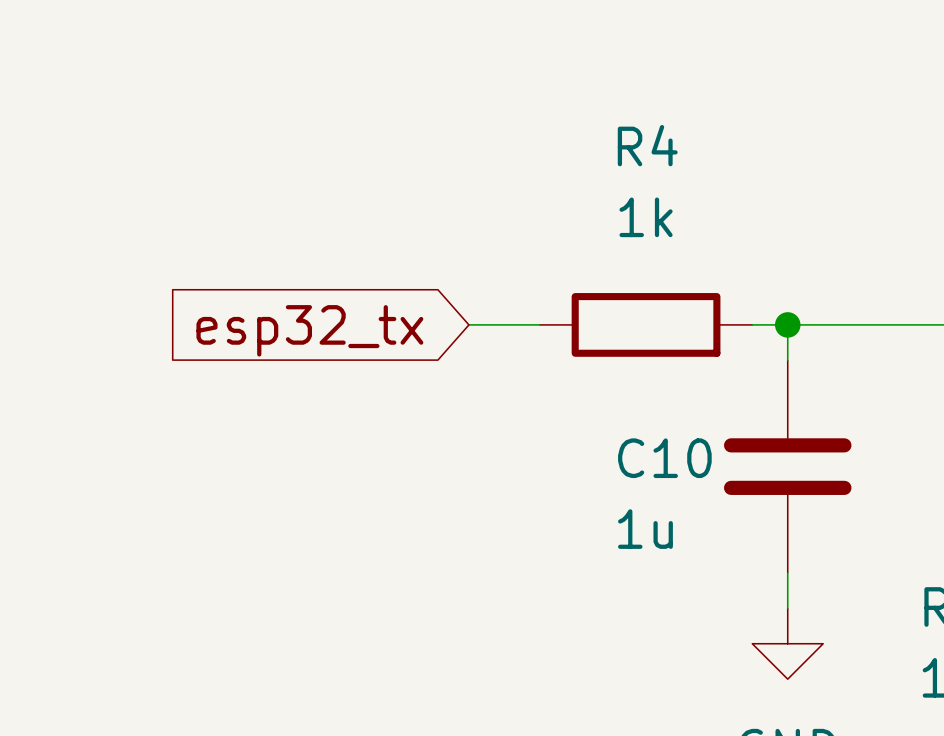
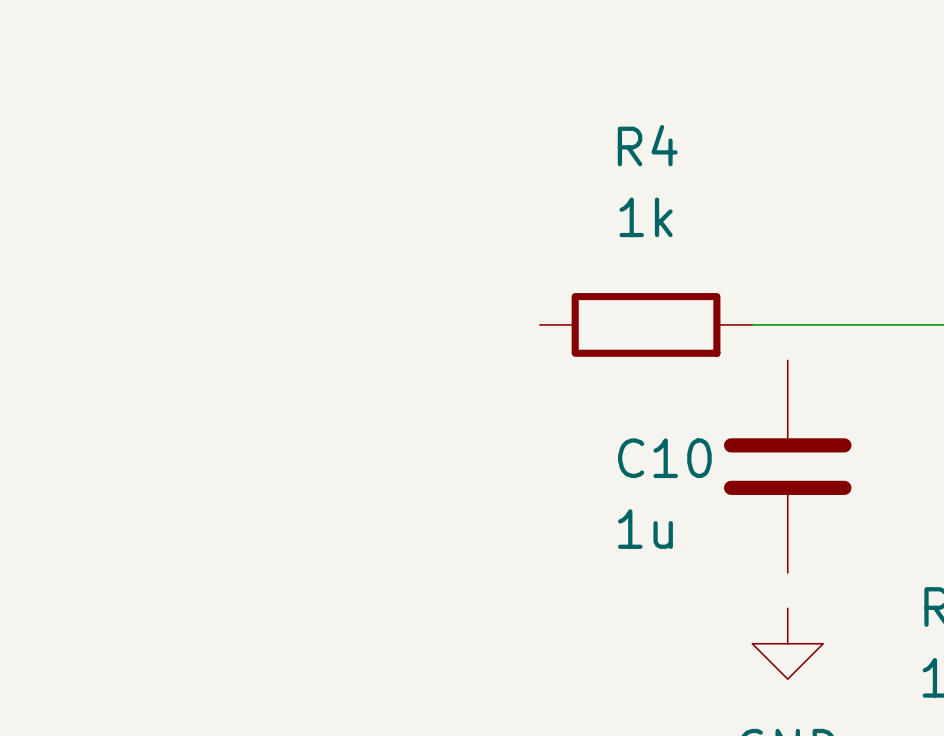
wire: (468, 324) (539, 324) -> none
wire: (787, 324) (787, 360) -> none
junction: (787, 324) -> none
global label: esp32_tx (309, 330) -> none
wire: (787, 572) (787, 608) -> none

